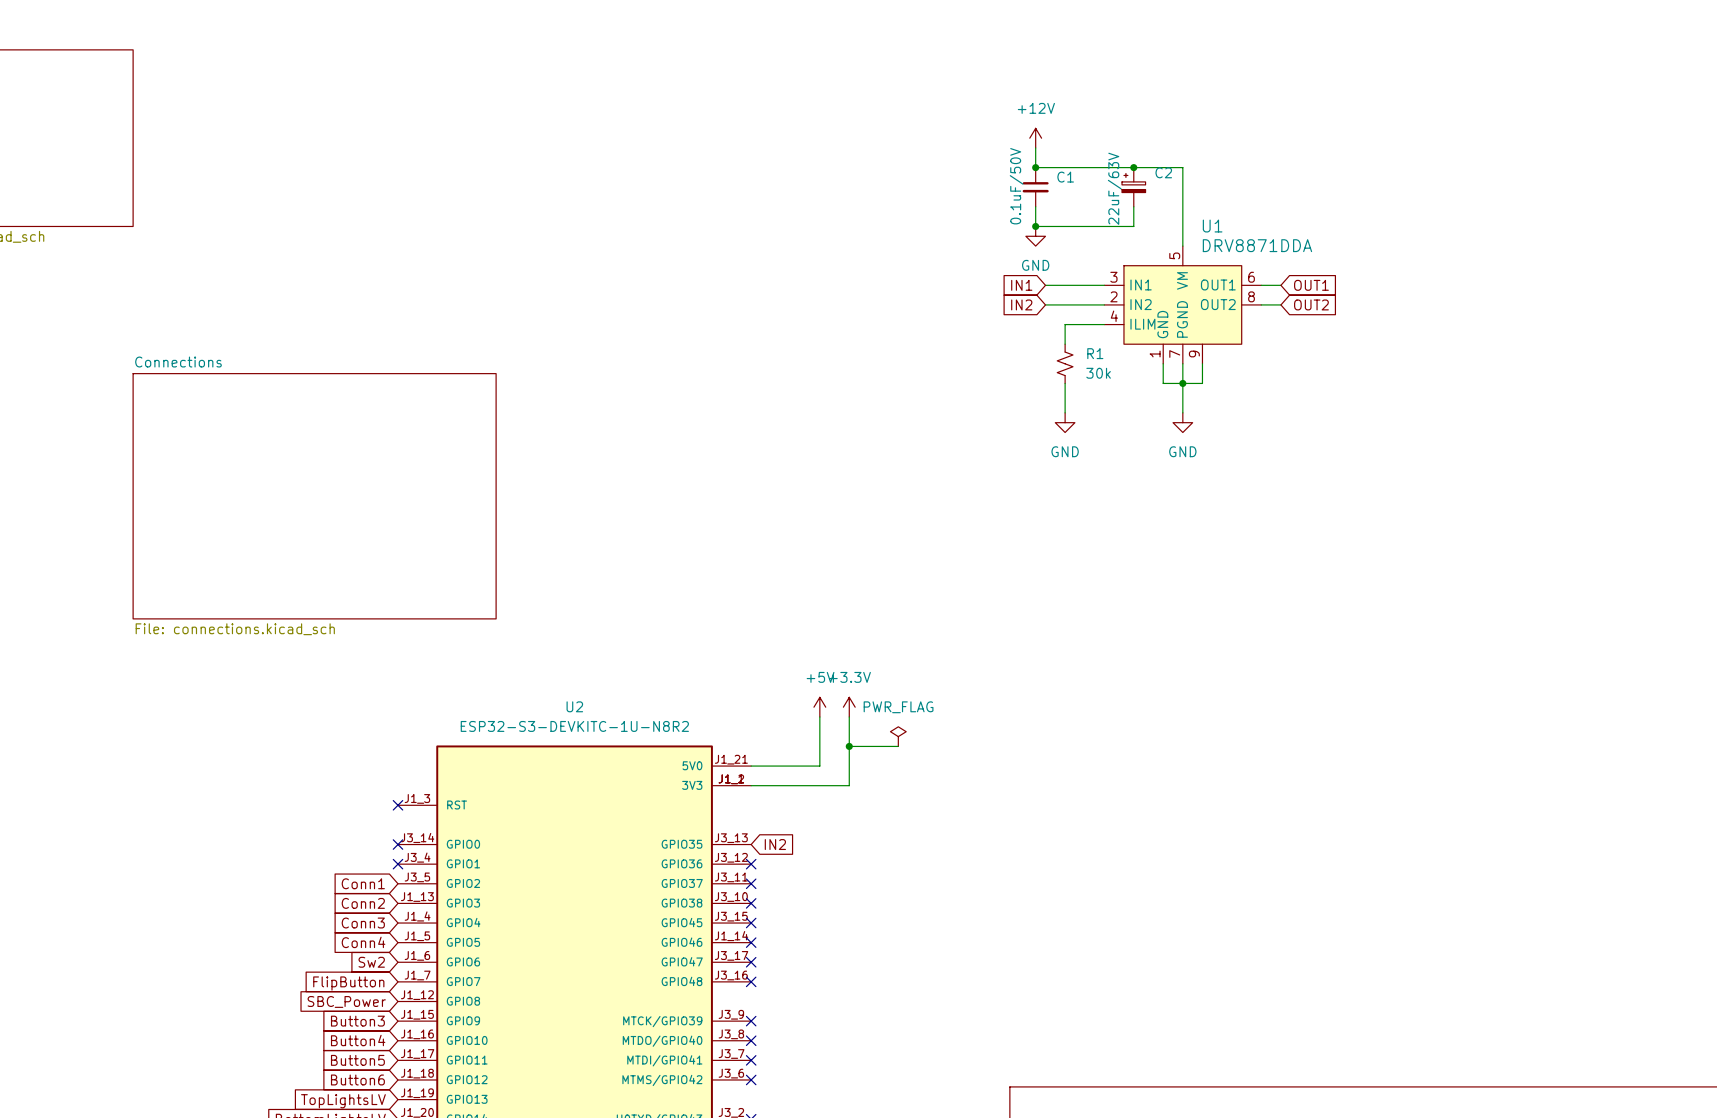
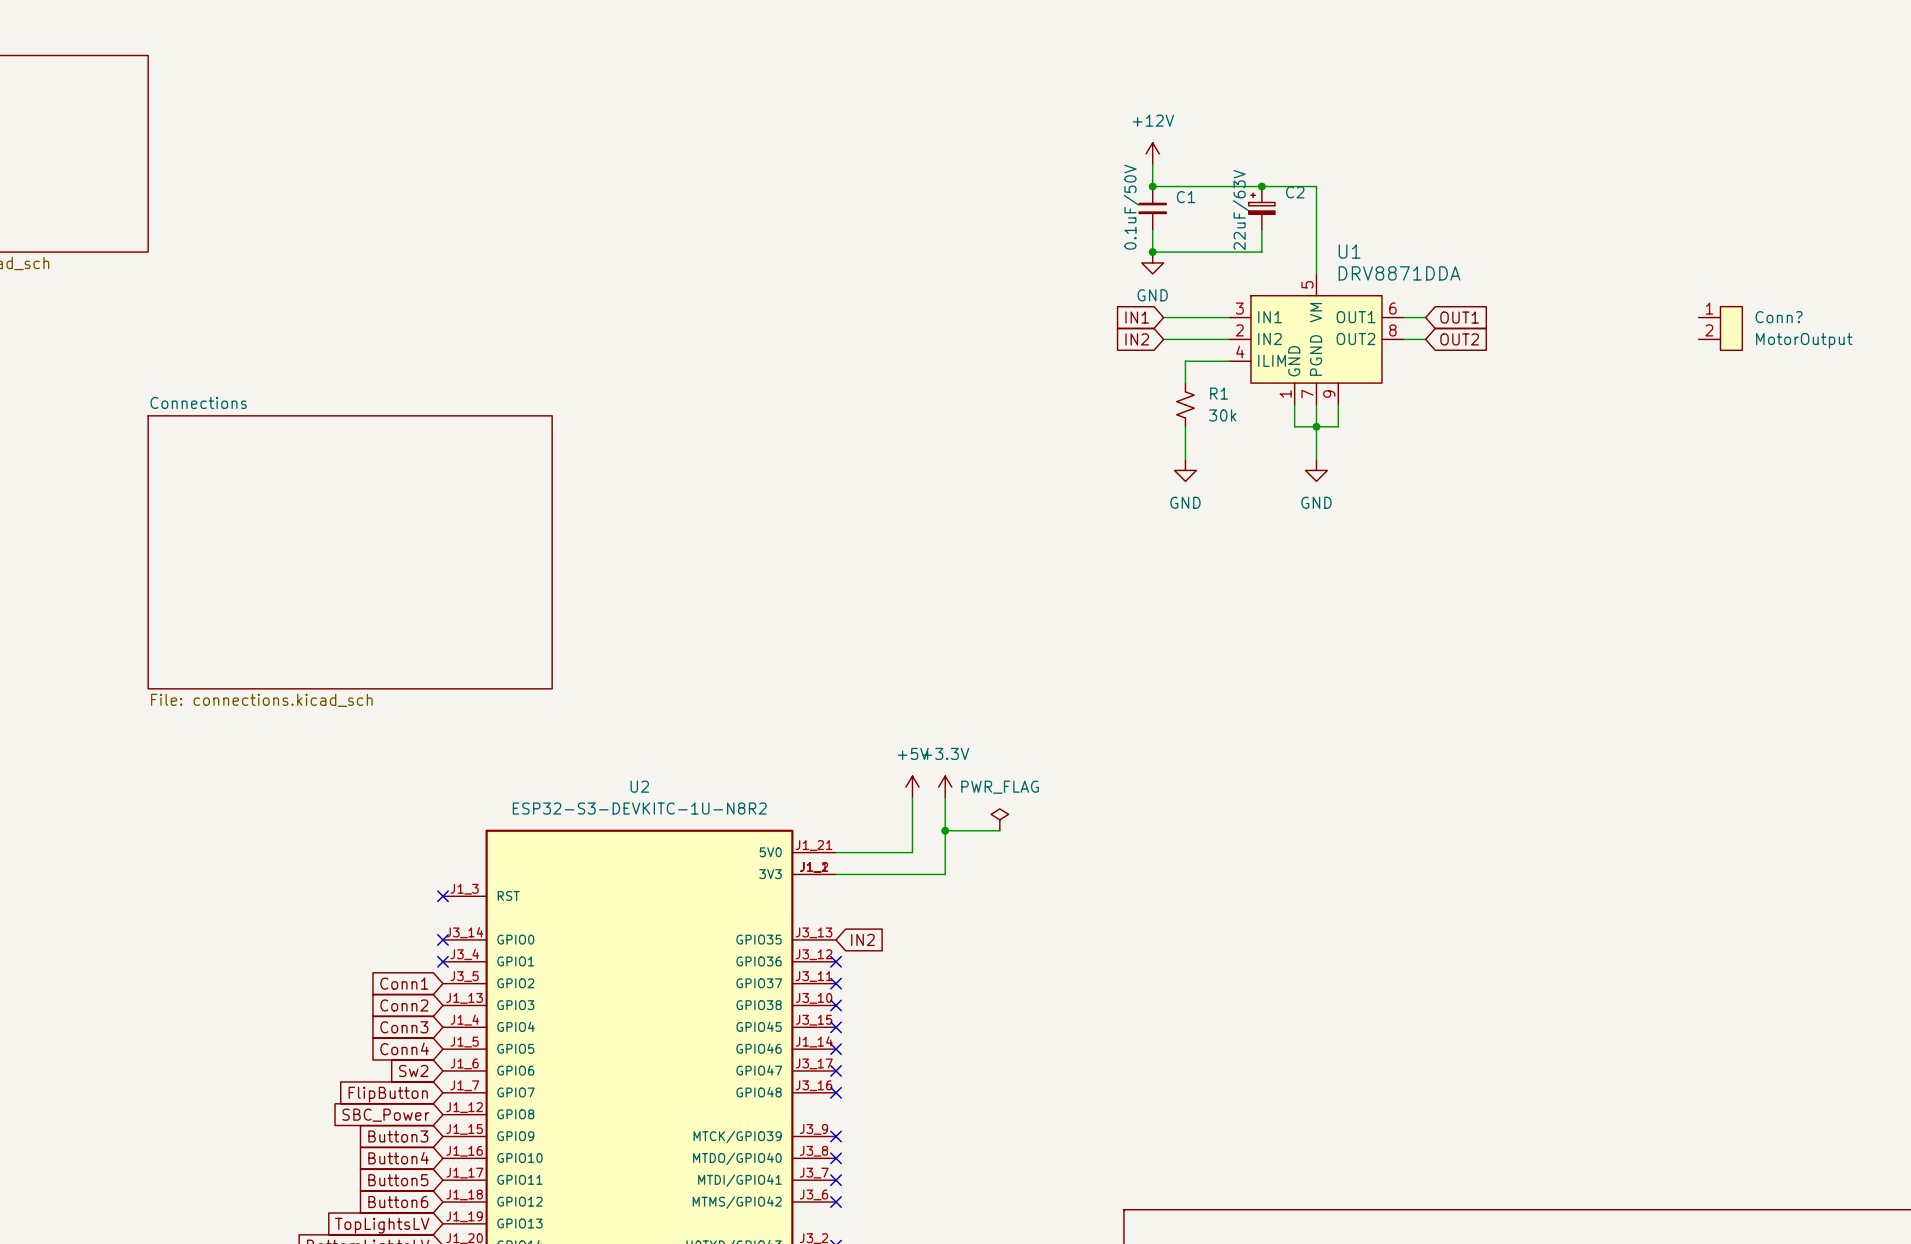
Conn?: none -> MotorOutput (1720, 328)

